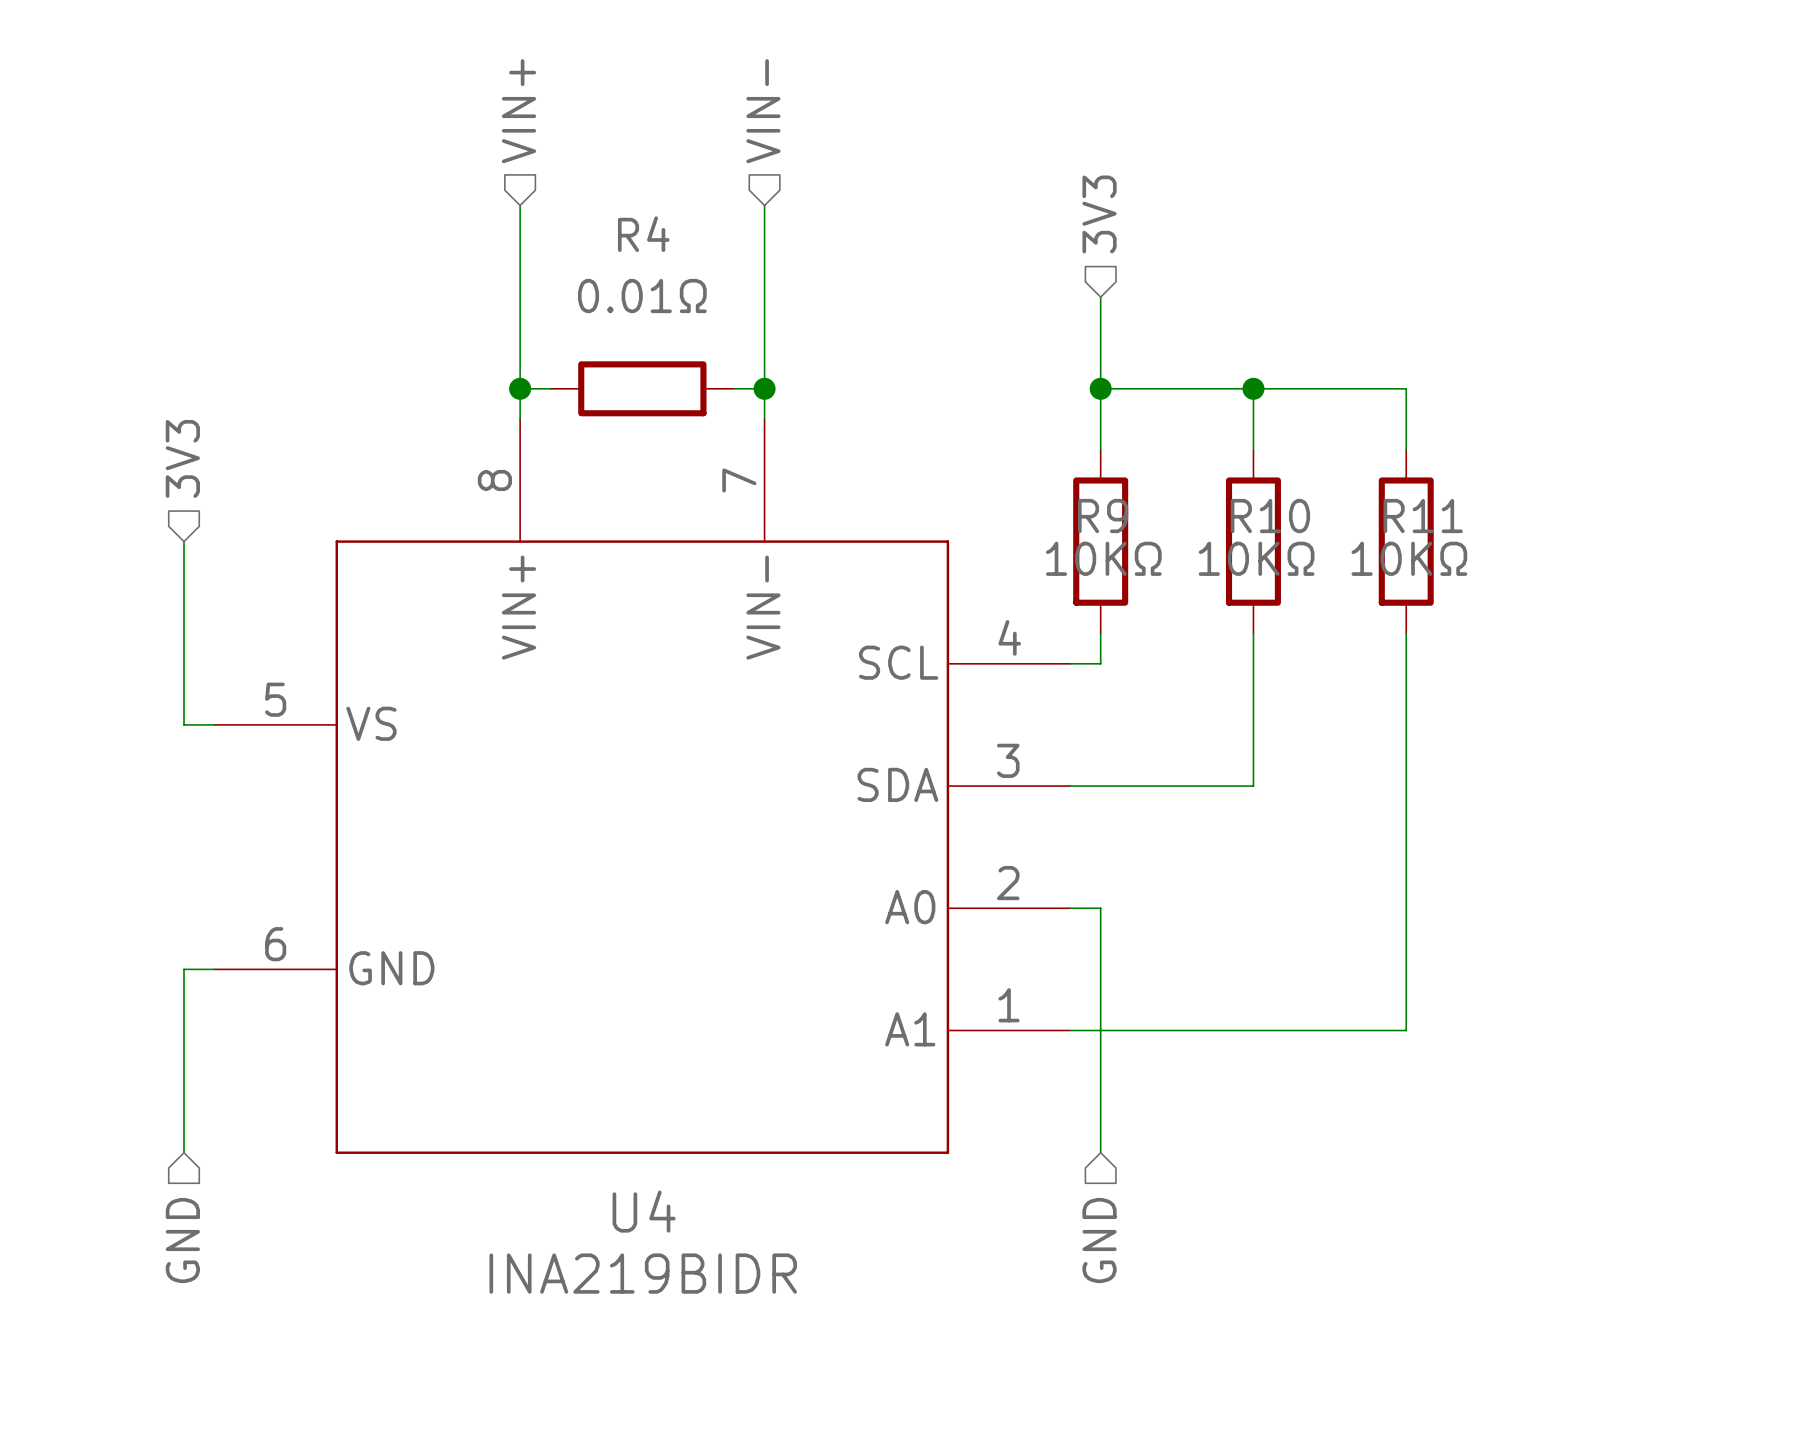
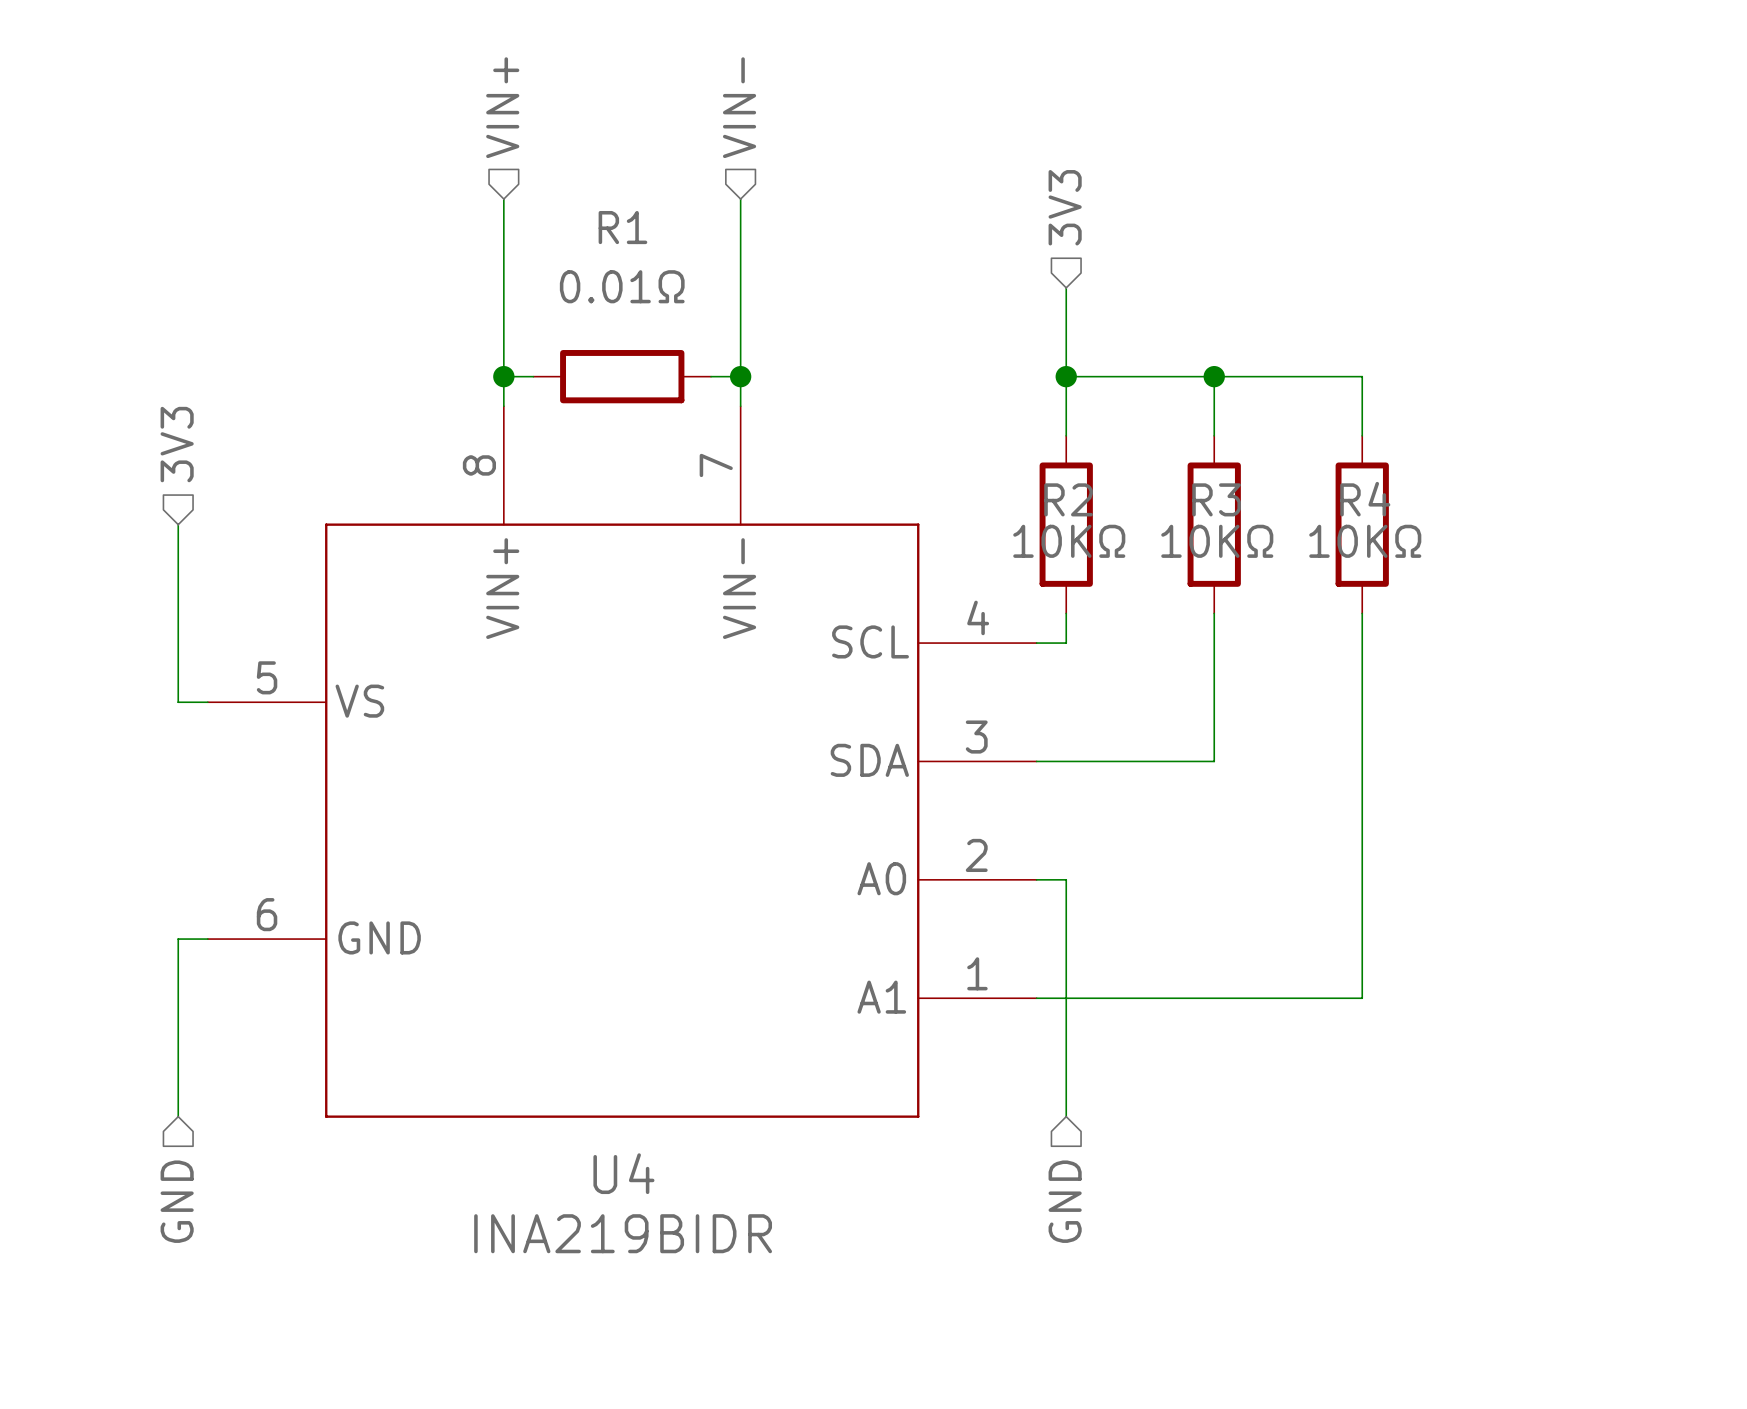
R4 name: R4 (643, 234) -> R1 (622, 227)
R9 name: R9 (1103, 516) -> R2 (1068, 499)
R10 name: R10 (1270, 516) -> R3 (1216, 499)
R11 name: R11 (1423, 516) -> R4 (1365, 499)

